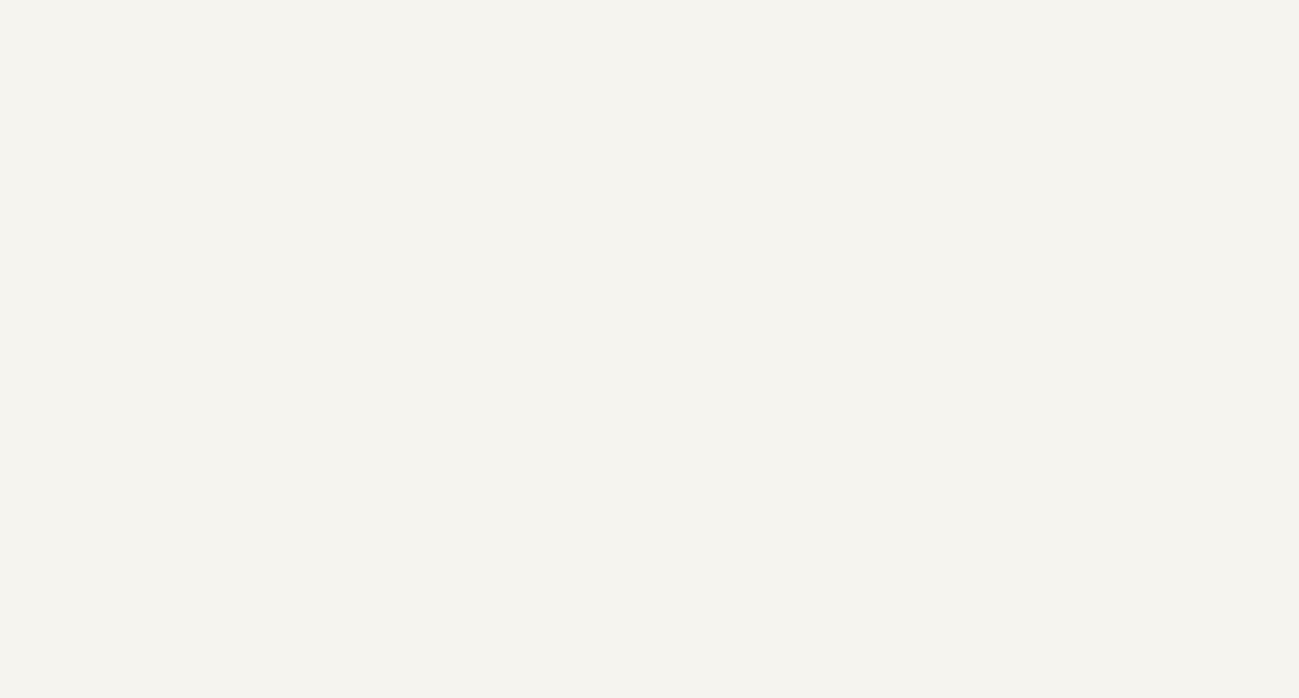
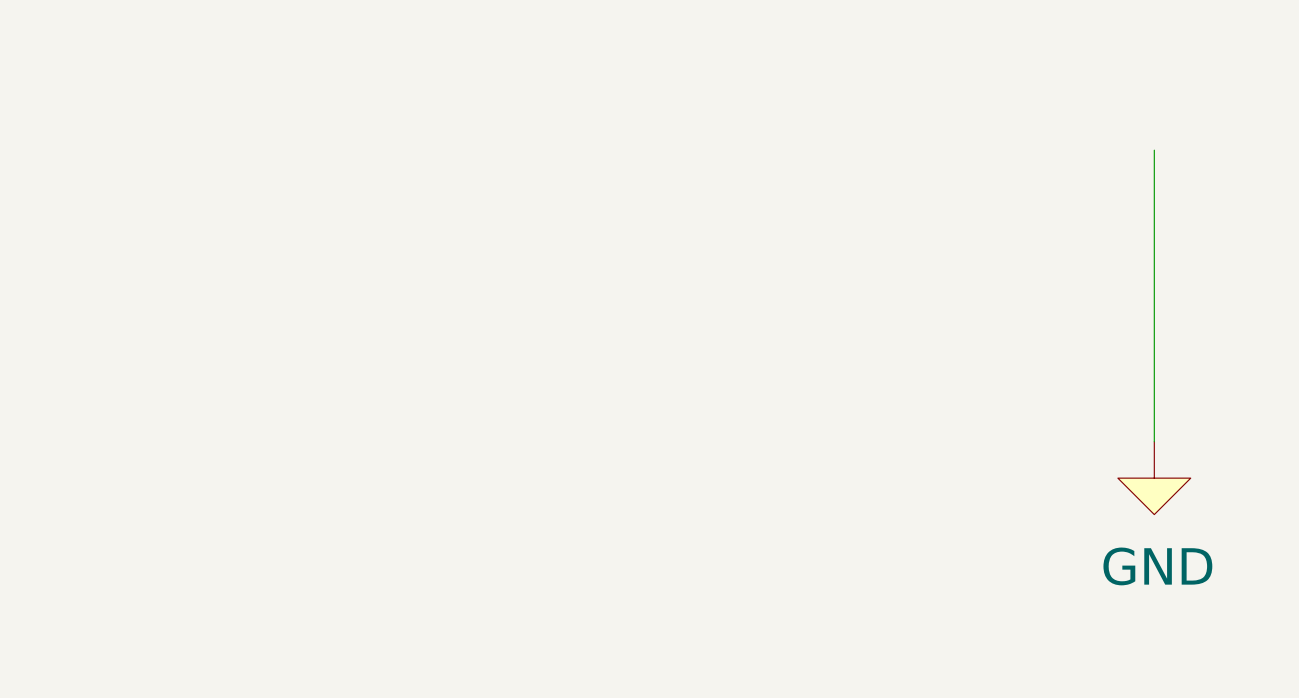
wire: none -> (1154, 150) (1154, 441)
power symbol: none -> GND (1154, 478)

